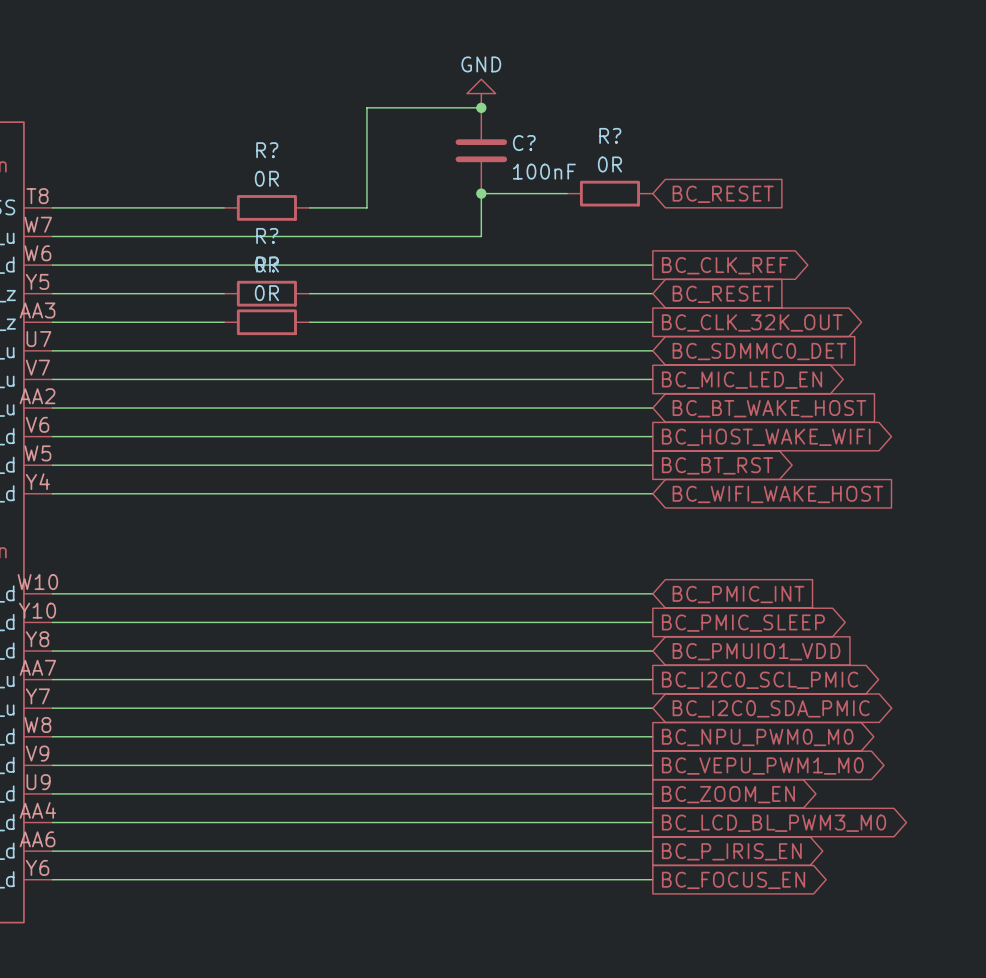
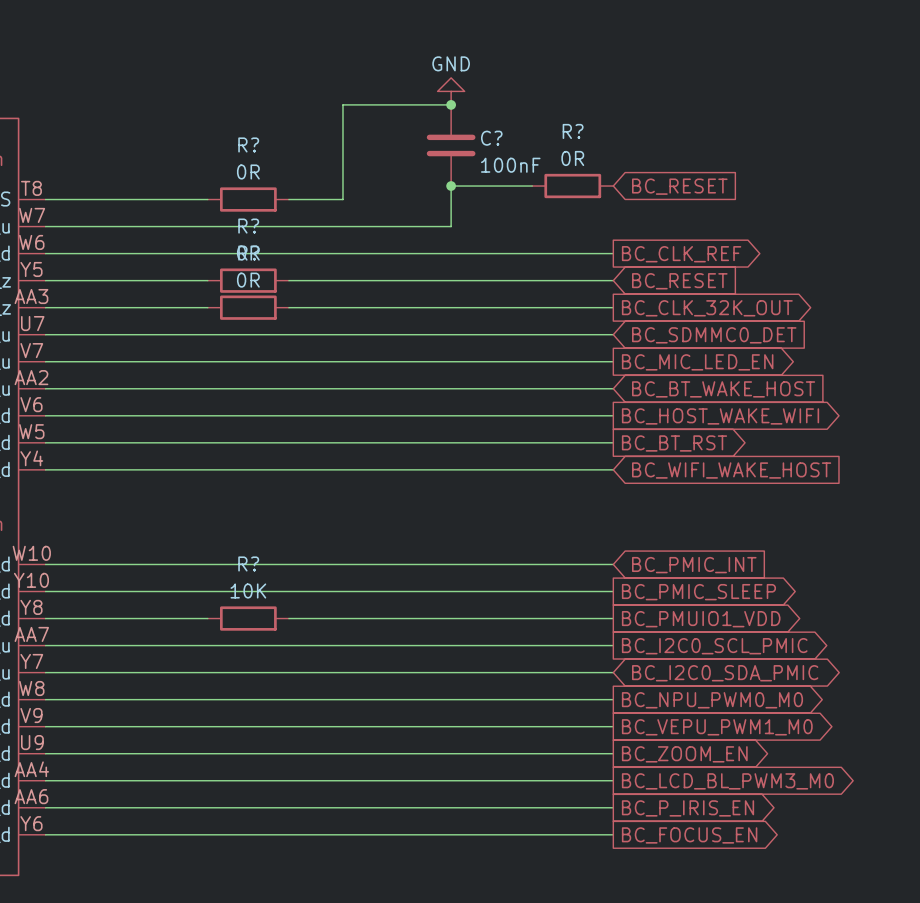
wire: (224, 651) (309, 651) -> none
R?: none -> 10K (248, 618)
global label shape: input (756, 651) -> output (701, 619)

